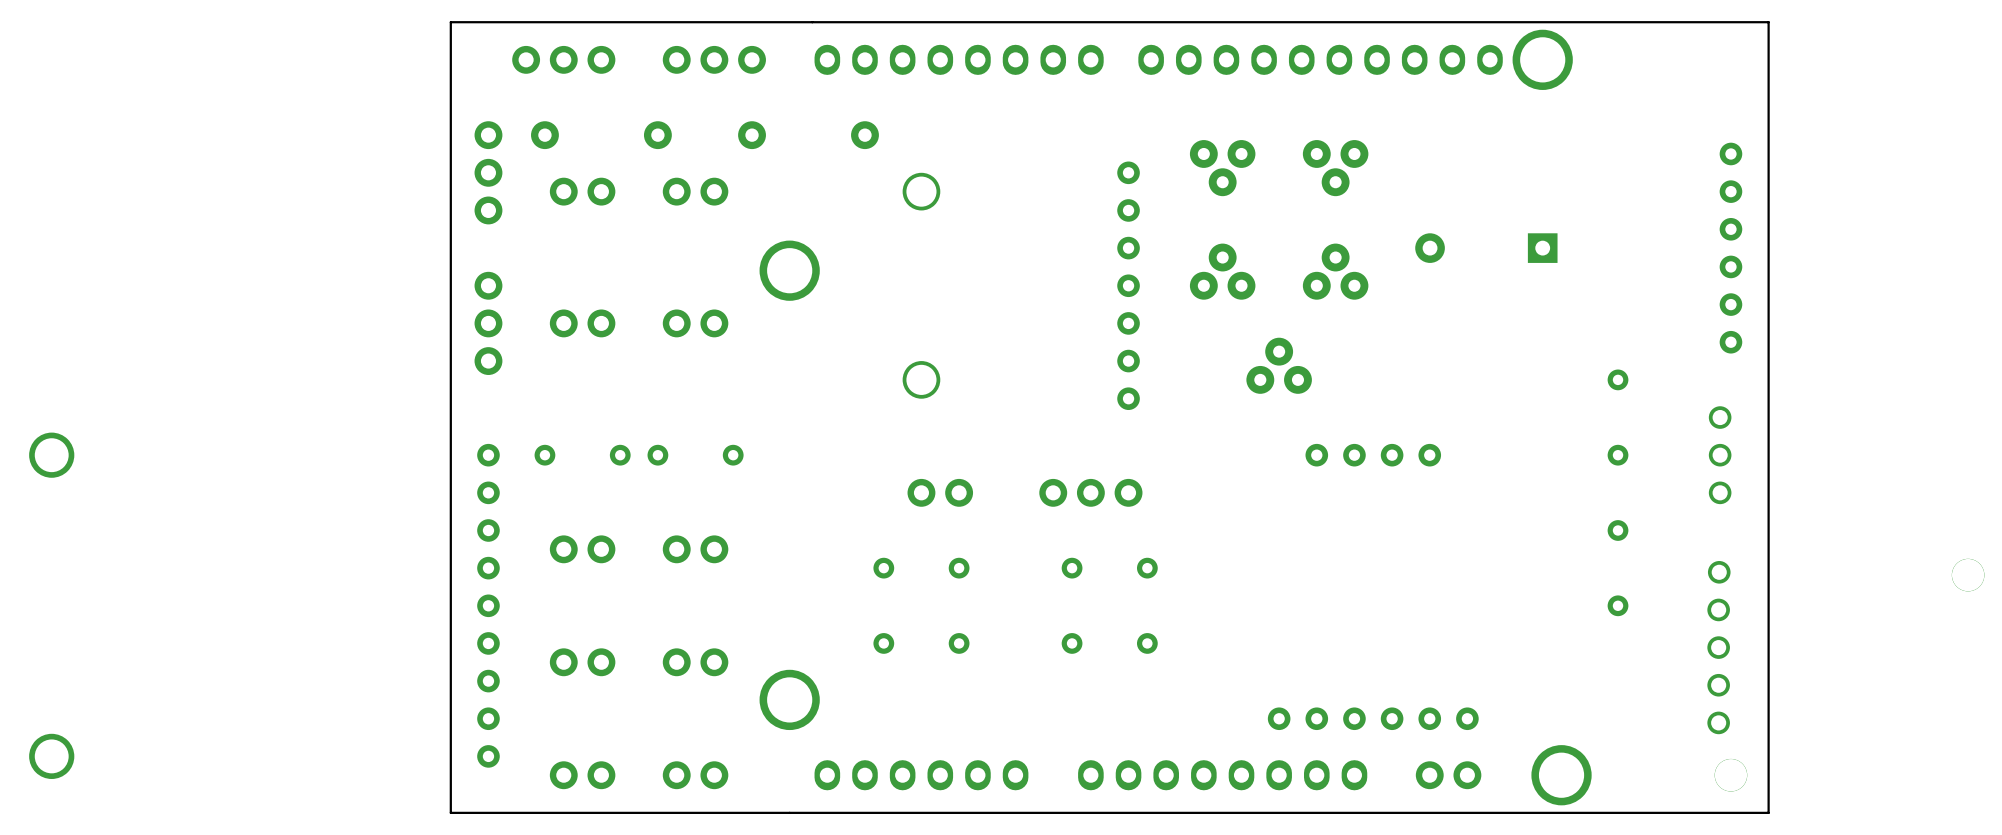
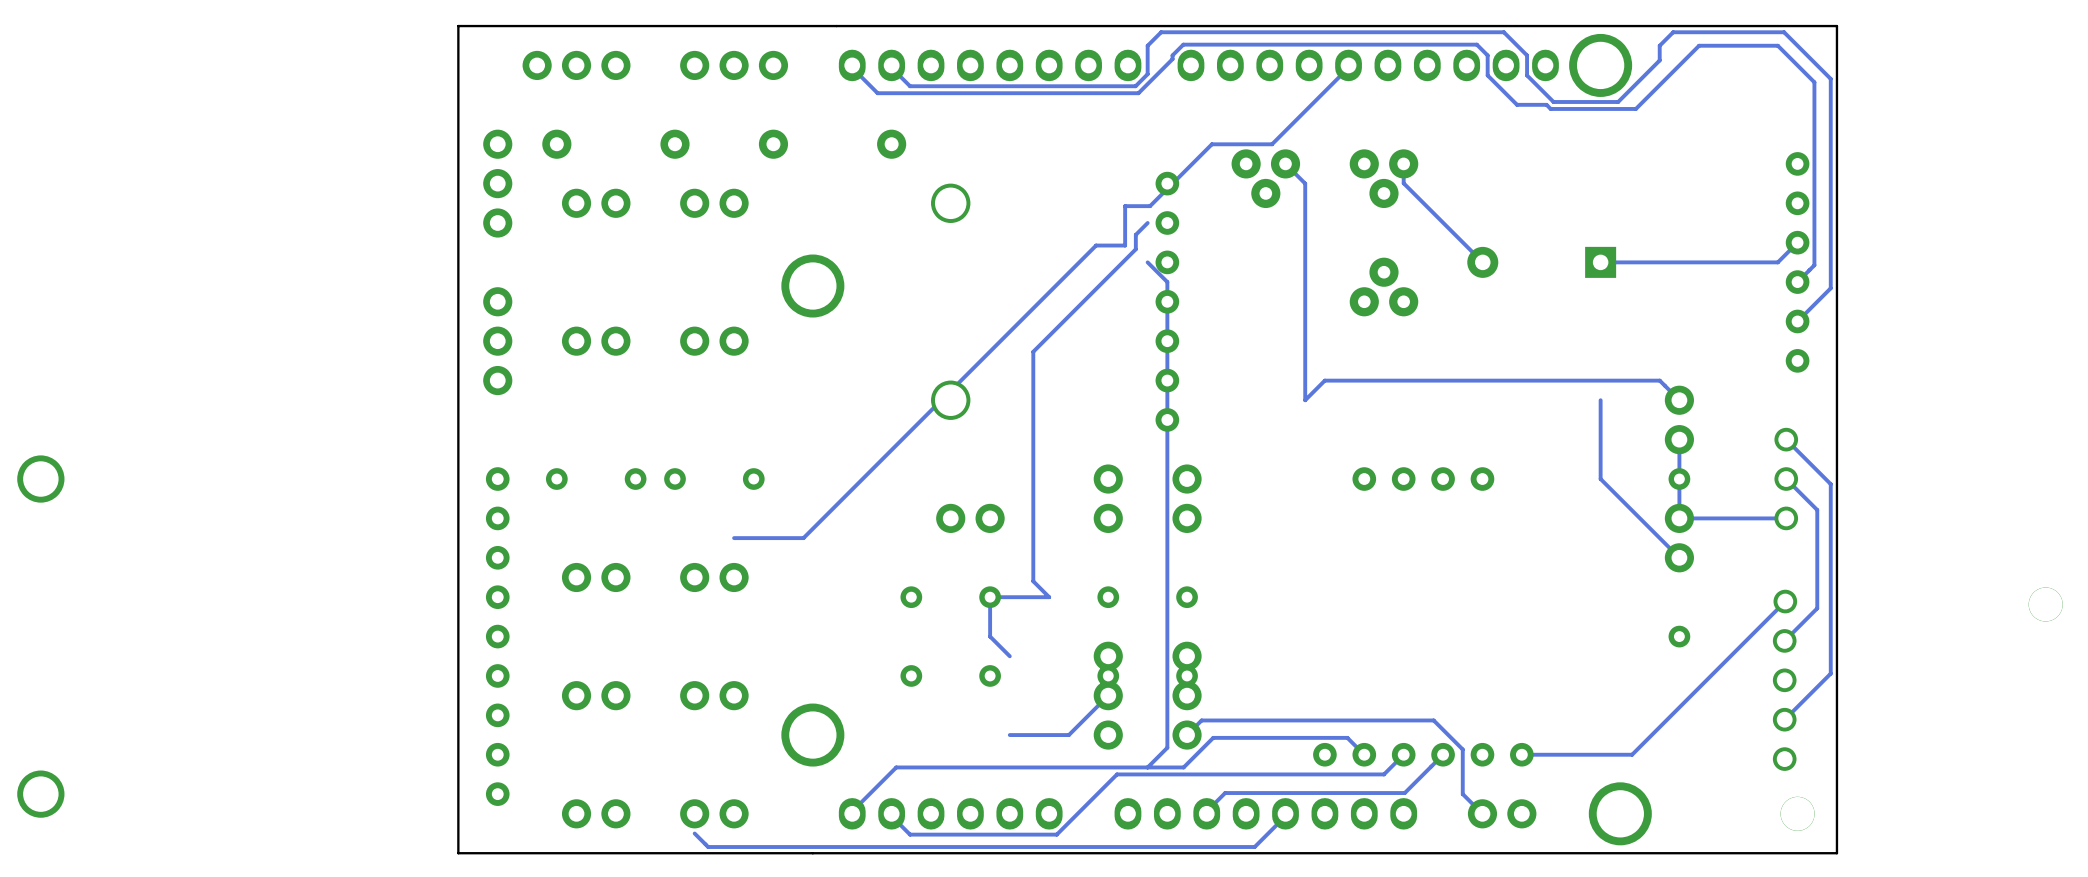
track: none -> (852, 65) (852, 67) (877, 93) (1138, 93) (1172, 59) (1172, 55) (1183, 44) (1476, 44) (1487, 55) (1487, 75) (1517, 104) (1546, 104) (1550, 108) (1635, 108) (1699, 45) (1777, 45) (1814, 82) (1814, 265) (1797, 282)
track: none -> (891, 65) (891, 67) (910, 86) (1135, 86) (1147, 74) (1147, 45) (1161, 32) (1503, 32) (1527, 55) (1527, 75) (1553, 101) (1618, 101) (1659, 60) (1659, 45) (1673, 32) (1784, 32) (1830, 78) (1830, 288) (1797, 321)
track: none -> (1348, 65) (1348, 67) (1272, 144) (1211, 144) (1150, 206) (1125, 206) (1125, 245) (1096, 245) (803, 538) (734, 538)
track: none -> (1285, 163) (1305, 183) (1305, 400) (1324, 380) (1659, 380) (1679, 400)
track: none -> (1403, 163) (1403, 183) (1482, 262)
track: none -> (1147, 222) (1135, 234) (1135, 249) (1033, 351) (1033, 581) (1049, 597) (990, 597) (990, 636) (1009, 656)
track: none -> (1797, 242) (1777, 262) (1600, 262)
track: none -> (1147, 262) (1167, 282) (1167, 747) (1147, 767)
part: (1222, 271) -> none
part: (1279, 365) -> none
track: none -> (1600, 400) (1600, 479) (1679, 557)
part: none -> (1679, 419)
track: none -> (1679, 439) (1679, 518) (1786, 518)
track: none -> (1786, 439) (1830, 484) (1830, 673) (1784, 719)
track: none -> (1786, 479) (1817, 510) (1817, 608) (1784, 640)
part: none -> (1108, 498)
part: none -> (1187, 498)
part: (1090, 492) -> none
part: none -> (1679, 538)
track: none -> (1785, 601) (1632, 754) (1521, 754)
track: none -> (1108, 695) (1068, 735) (1009, 735)
part: none -> (1108, 695)
part: none -> (1187, 695)
track: none -> (1187, 735) (1201, 720) (1433, 720) (1462, 749) (1462, 794) (1482, 813)
track: none -> (1364, 754) (1347, 737) (1213, 737) (1183, 767) (896, 767) (852, 811) (852, 813)
track: none -> (1403, 754) (1383, 774) (1117, 774) (1056, 834) (910, 834) (891, 816) (891, 813)
track: none -> (1443, 754) (1404, 793) (1225, 793) (1206, 811) (1206, 813)
track: none -> (1285, 813) (1285, 816) (1254, 847) (708, 847) (694, 833)

